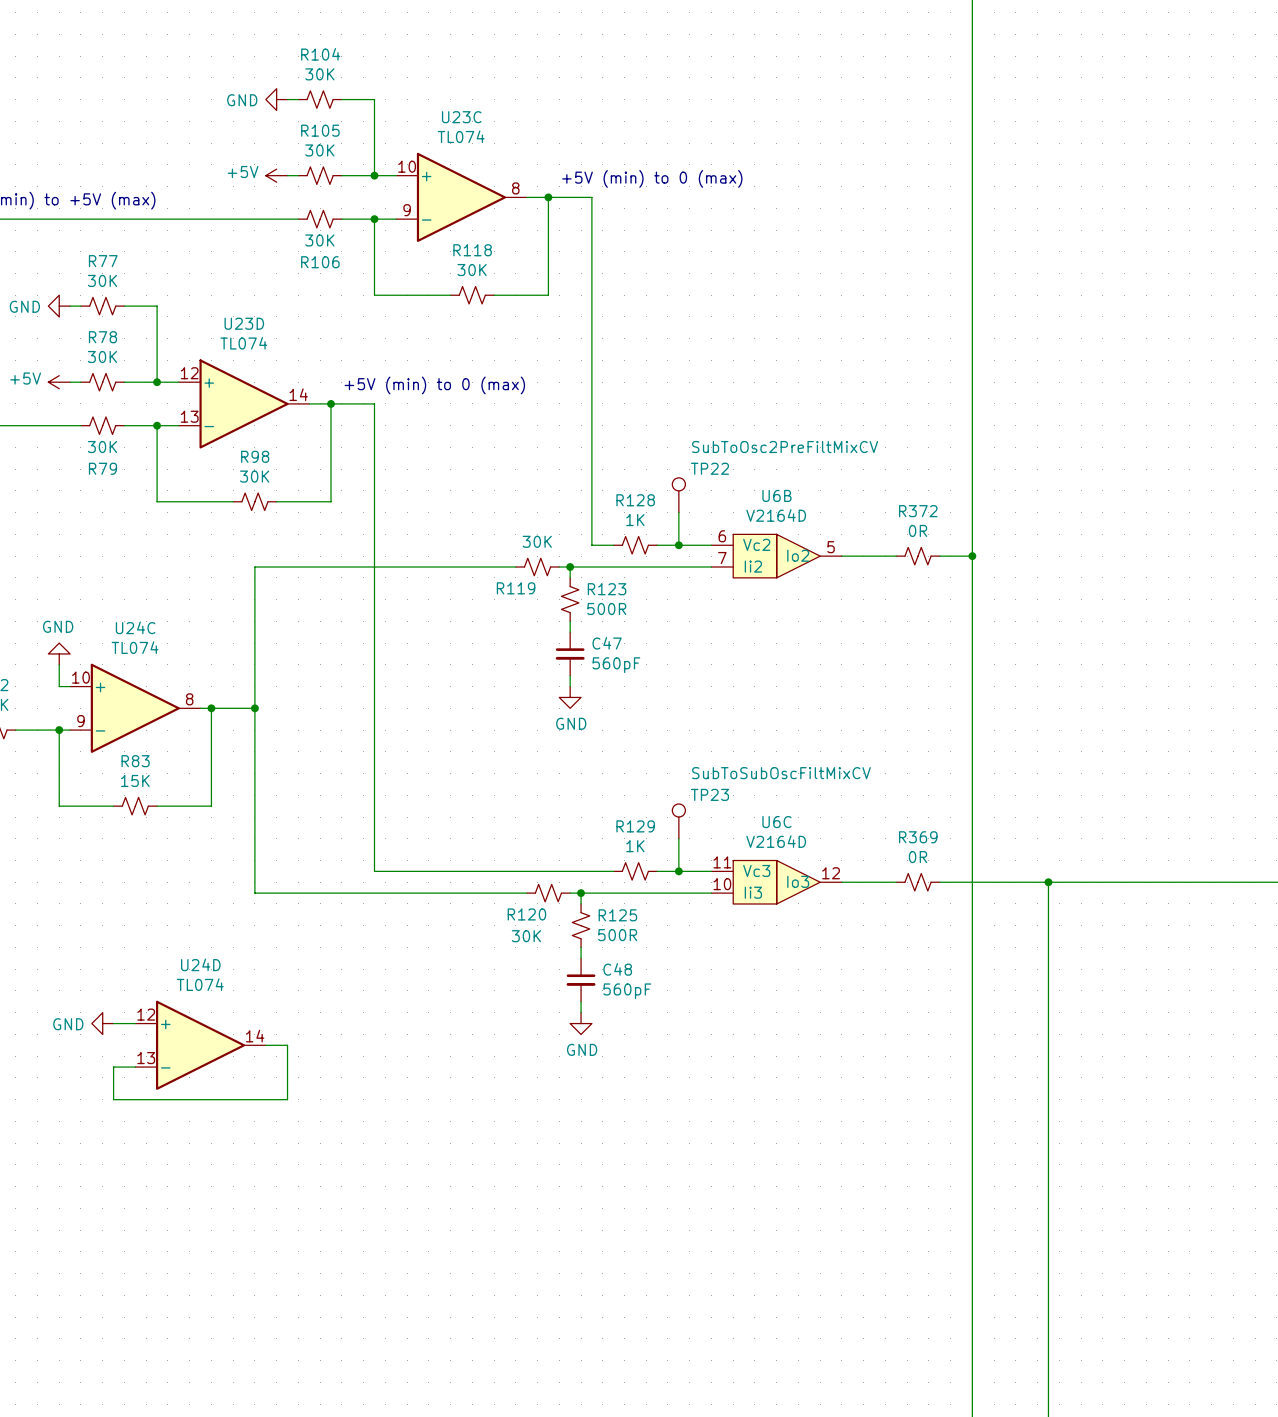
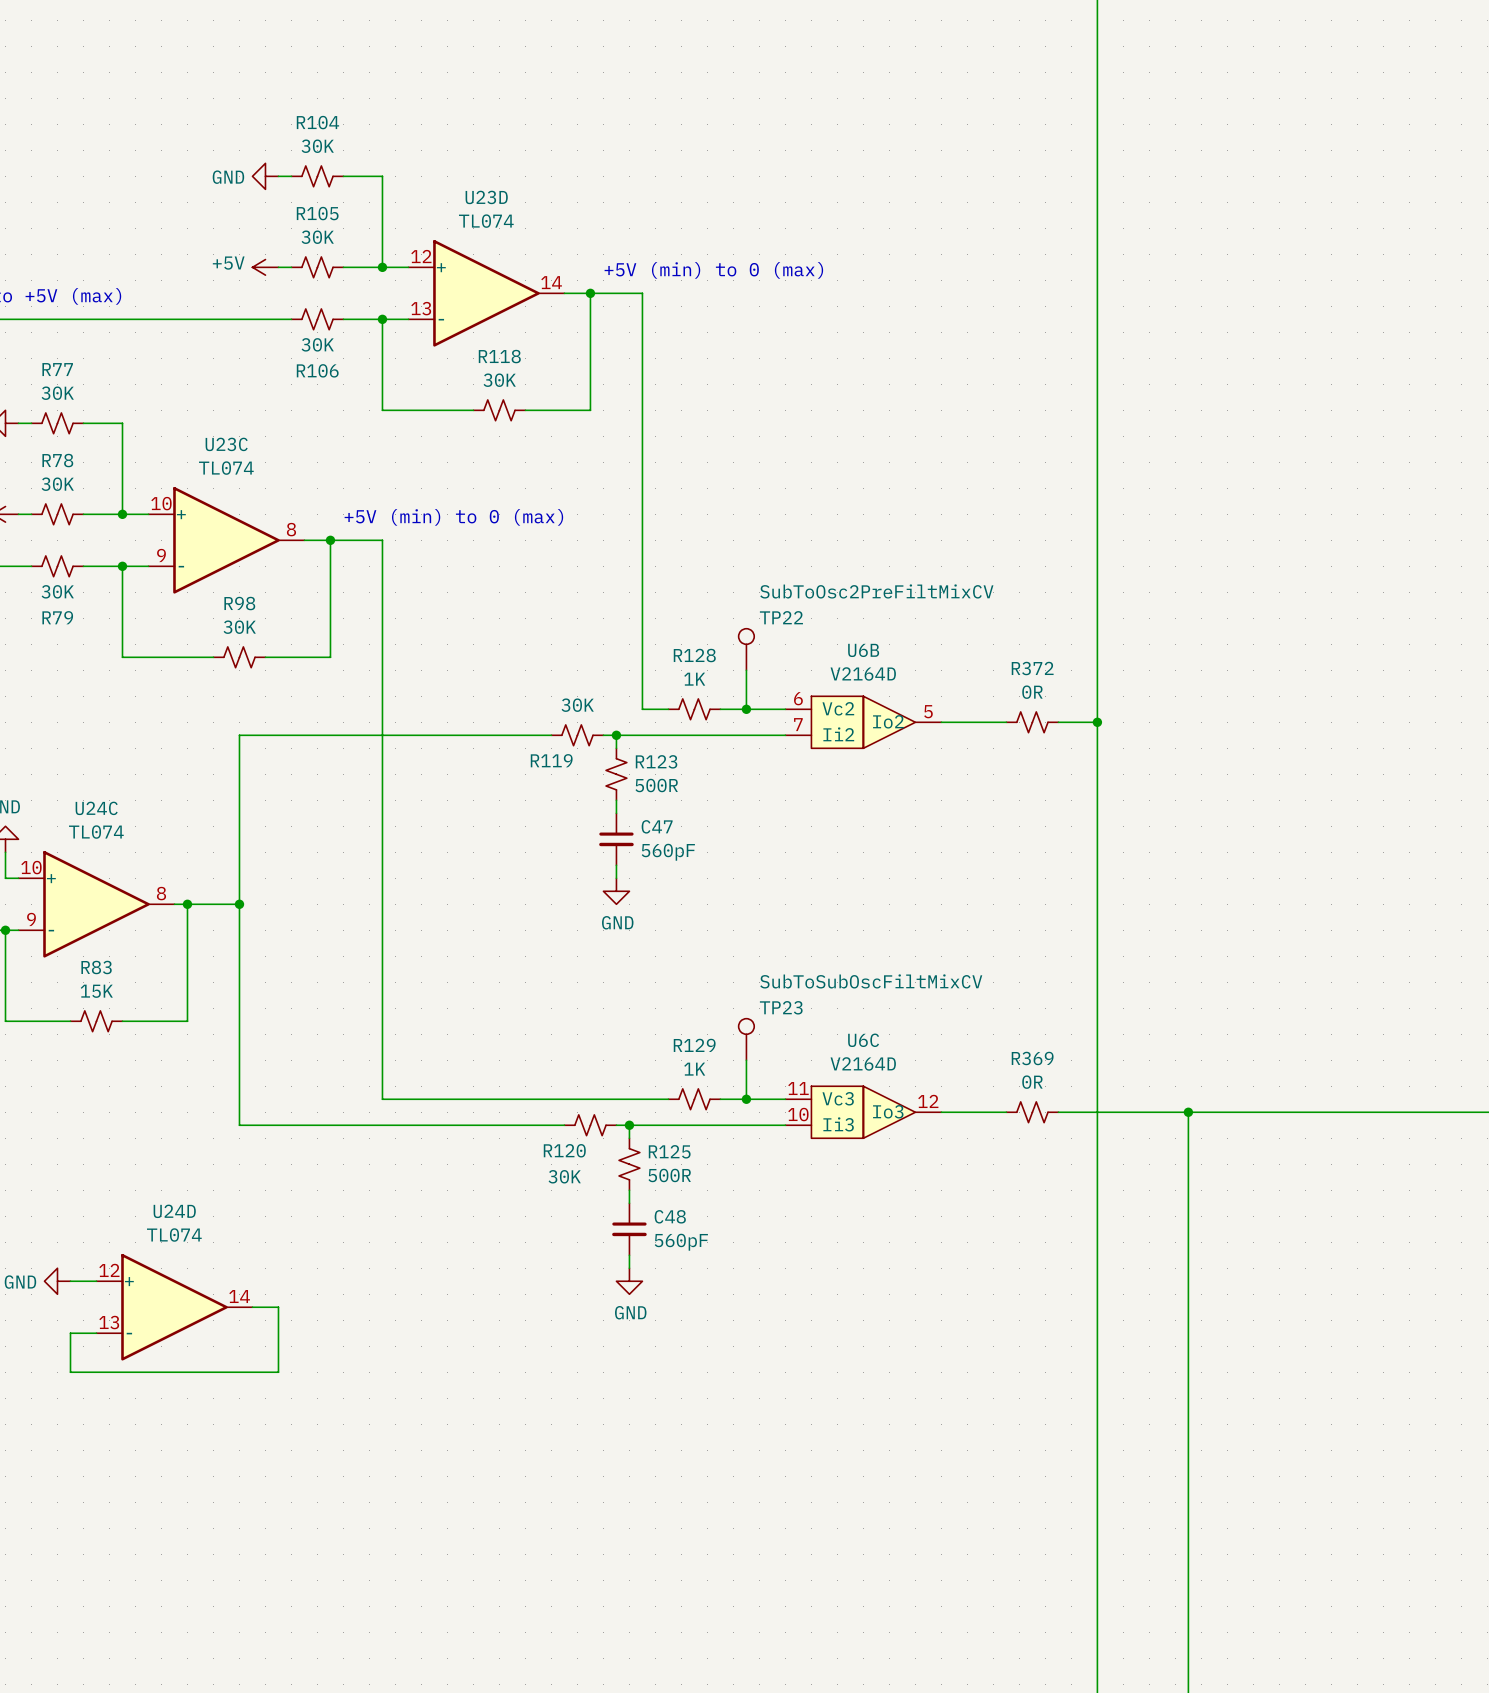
U23C position: (461, 197) -> (226, 540)
U23D position: (244, 403) -> (486, 293)

